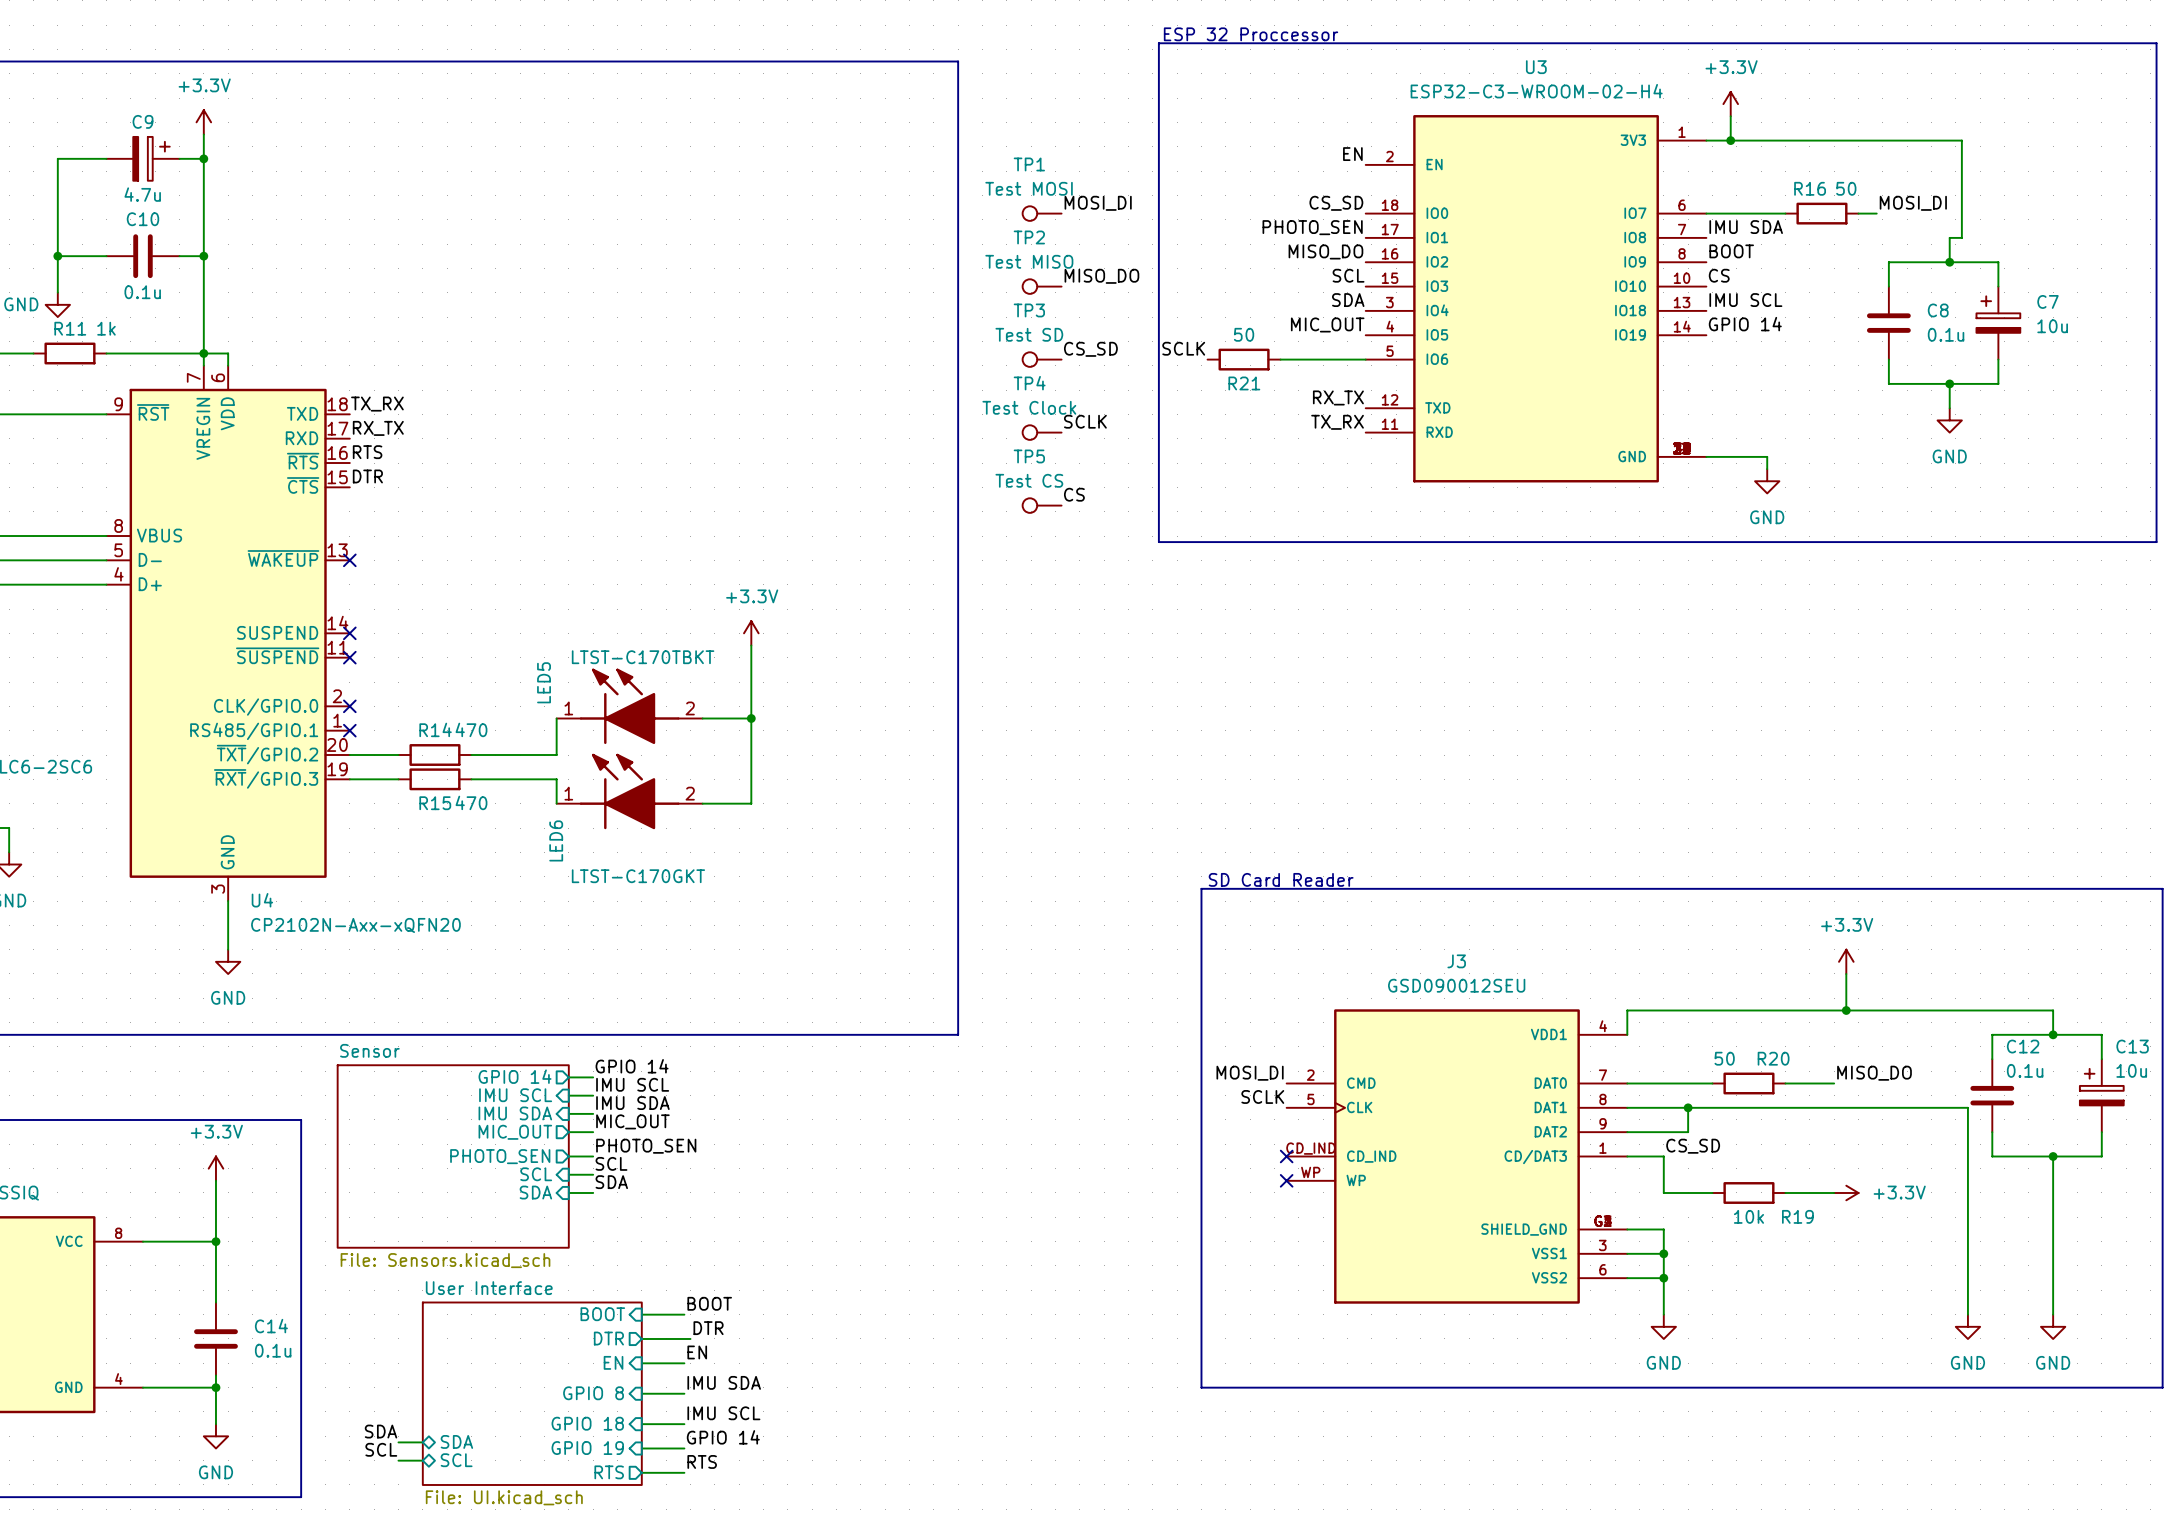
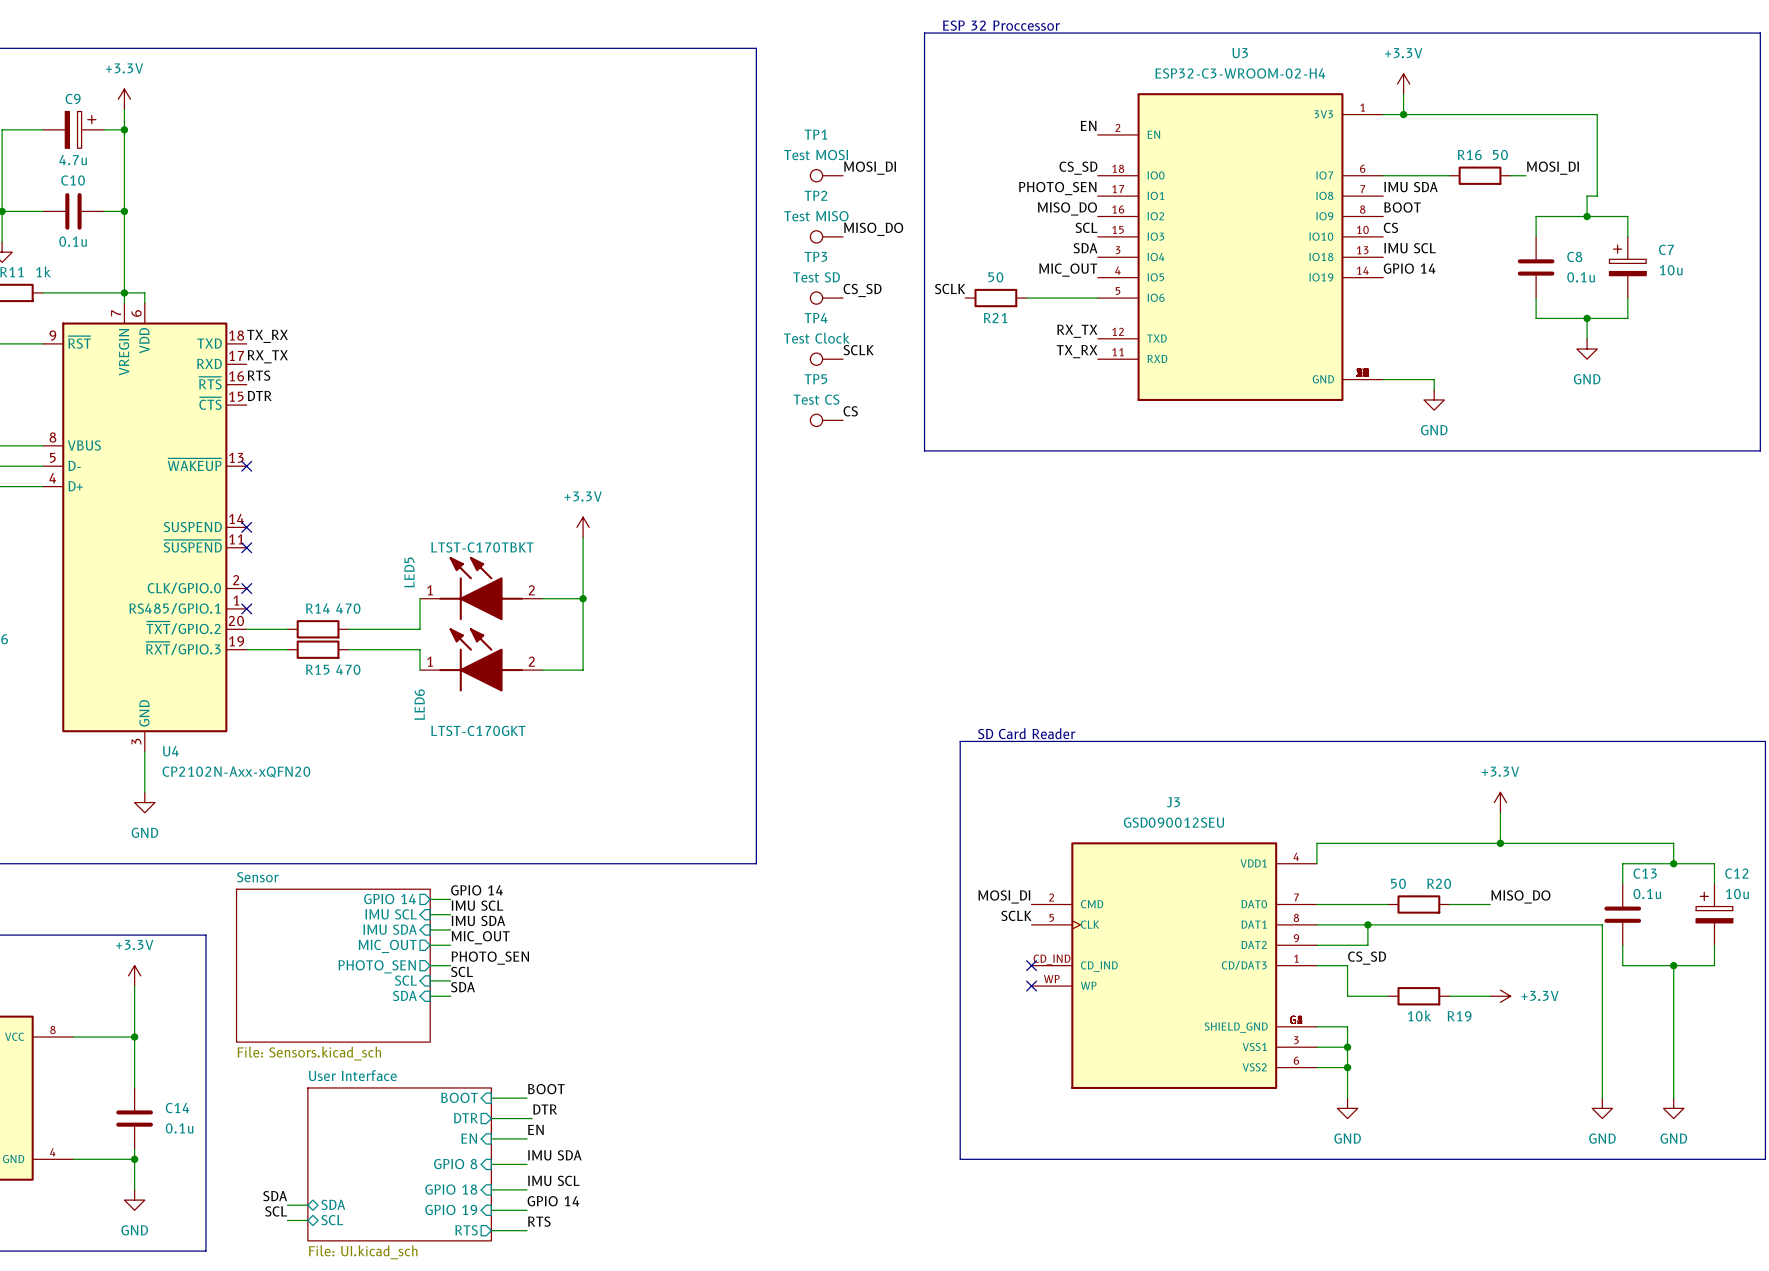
C12 name: C12 (2023, 1046) -> C13 (1645, 873)
C13 name: C13 (2132, 1046) -> C12 (1736, 873)

